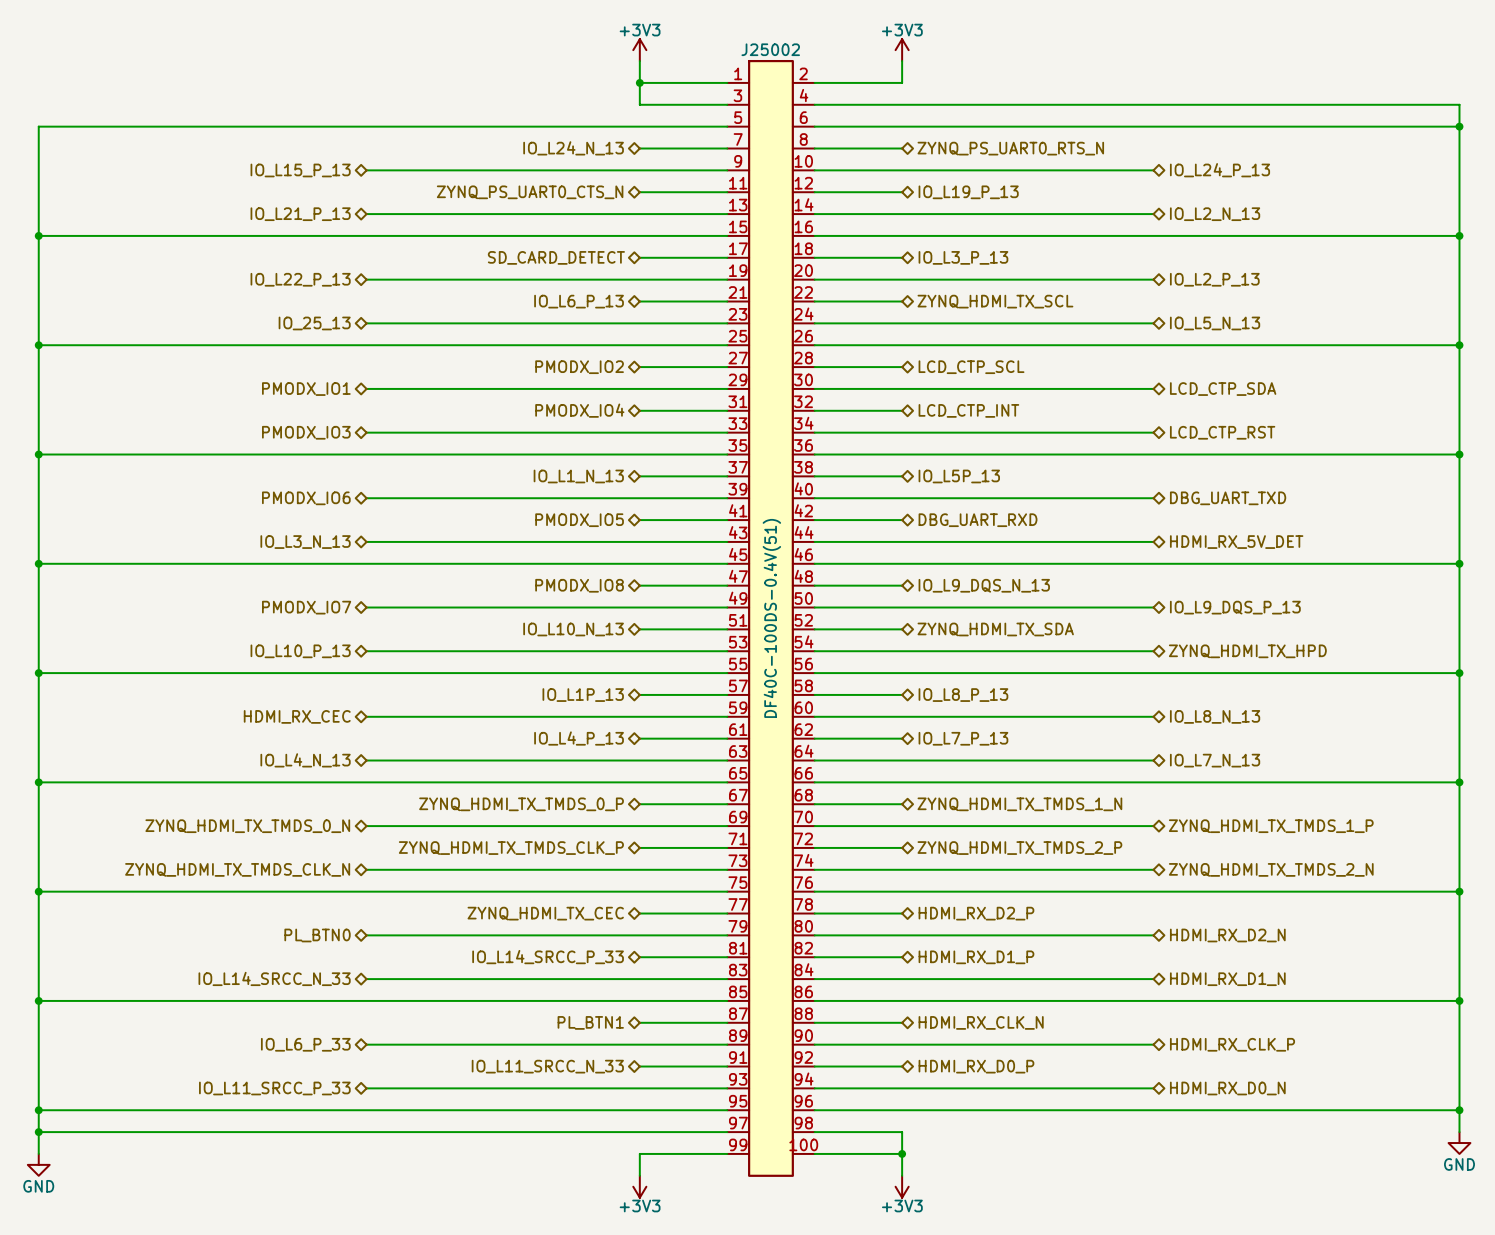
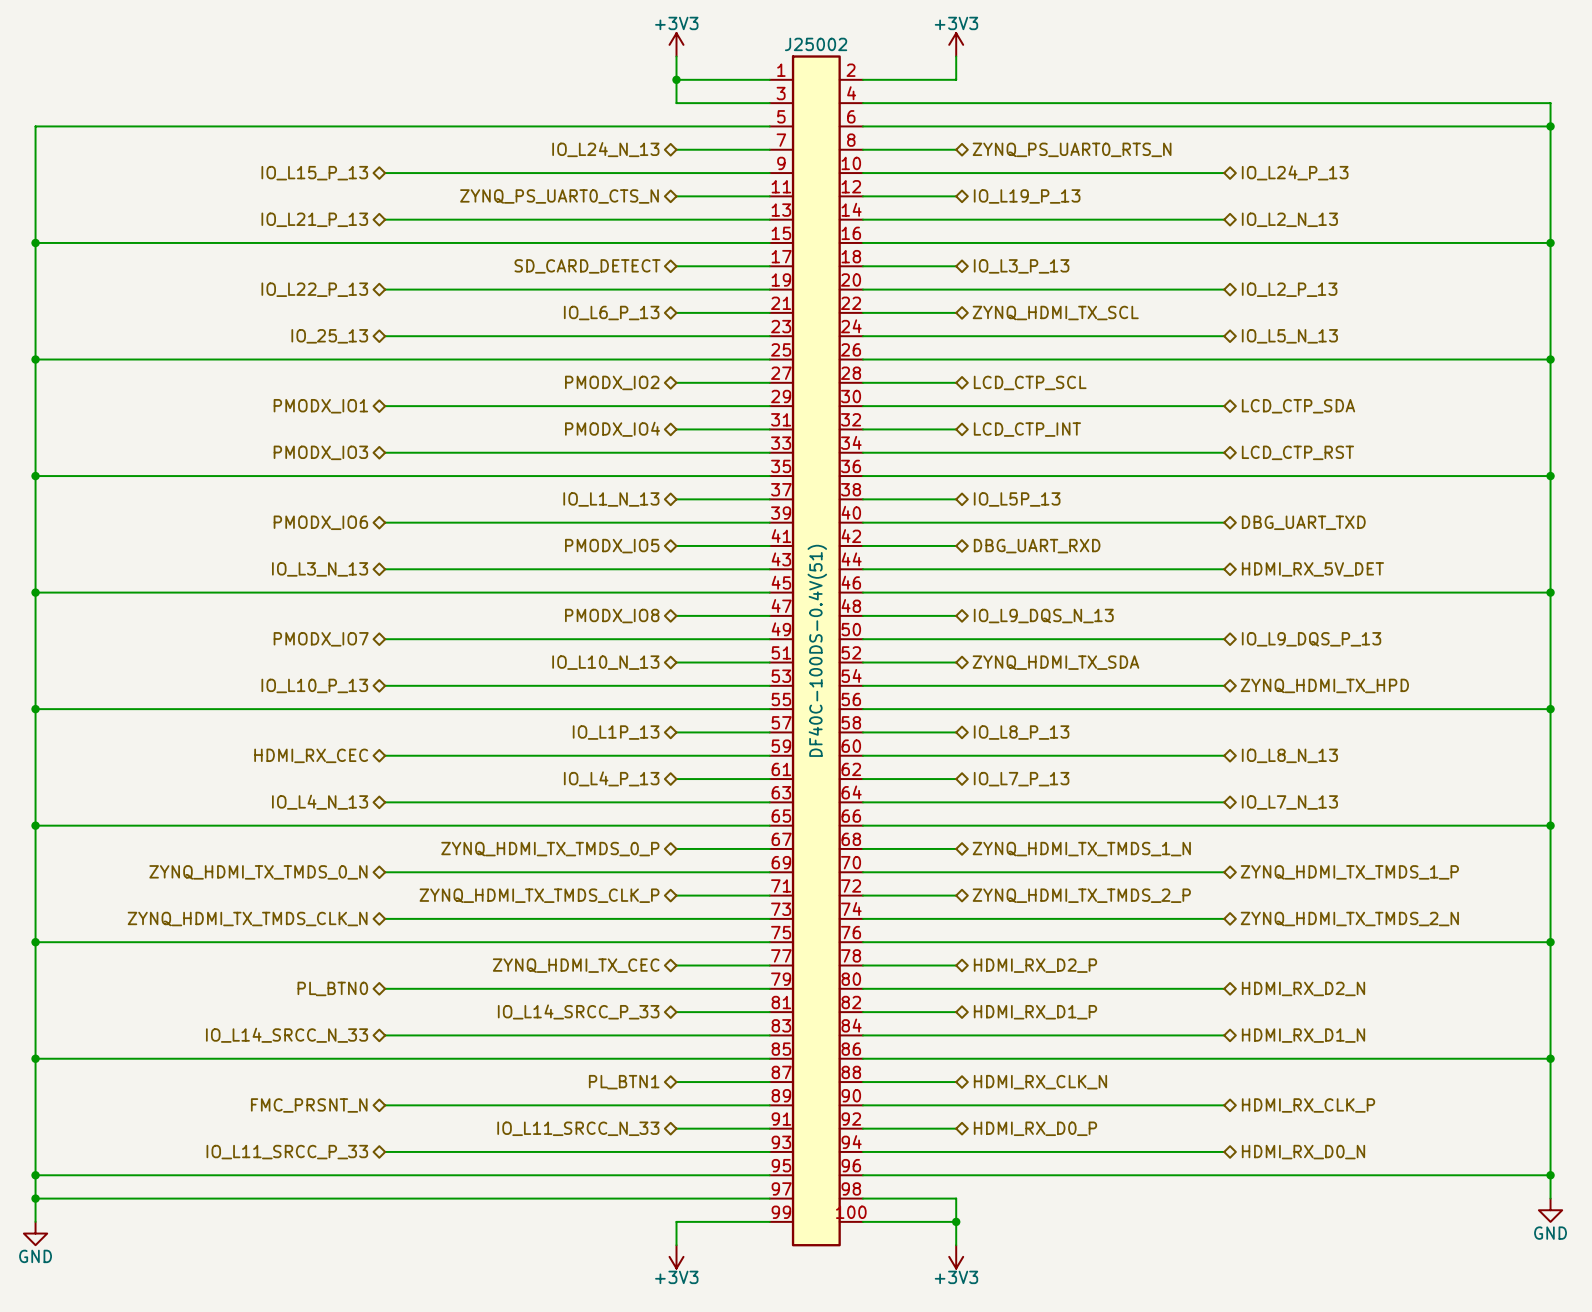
hierarchical label: IO_L6_P_33 (305, 1044) -> FMC_PRSNT_N (309, 1105)

